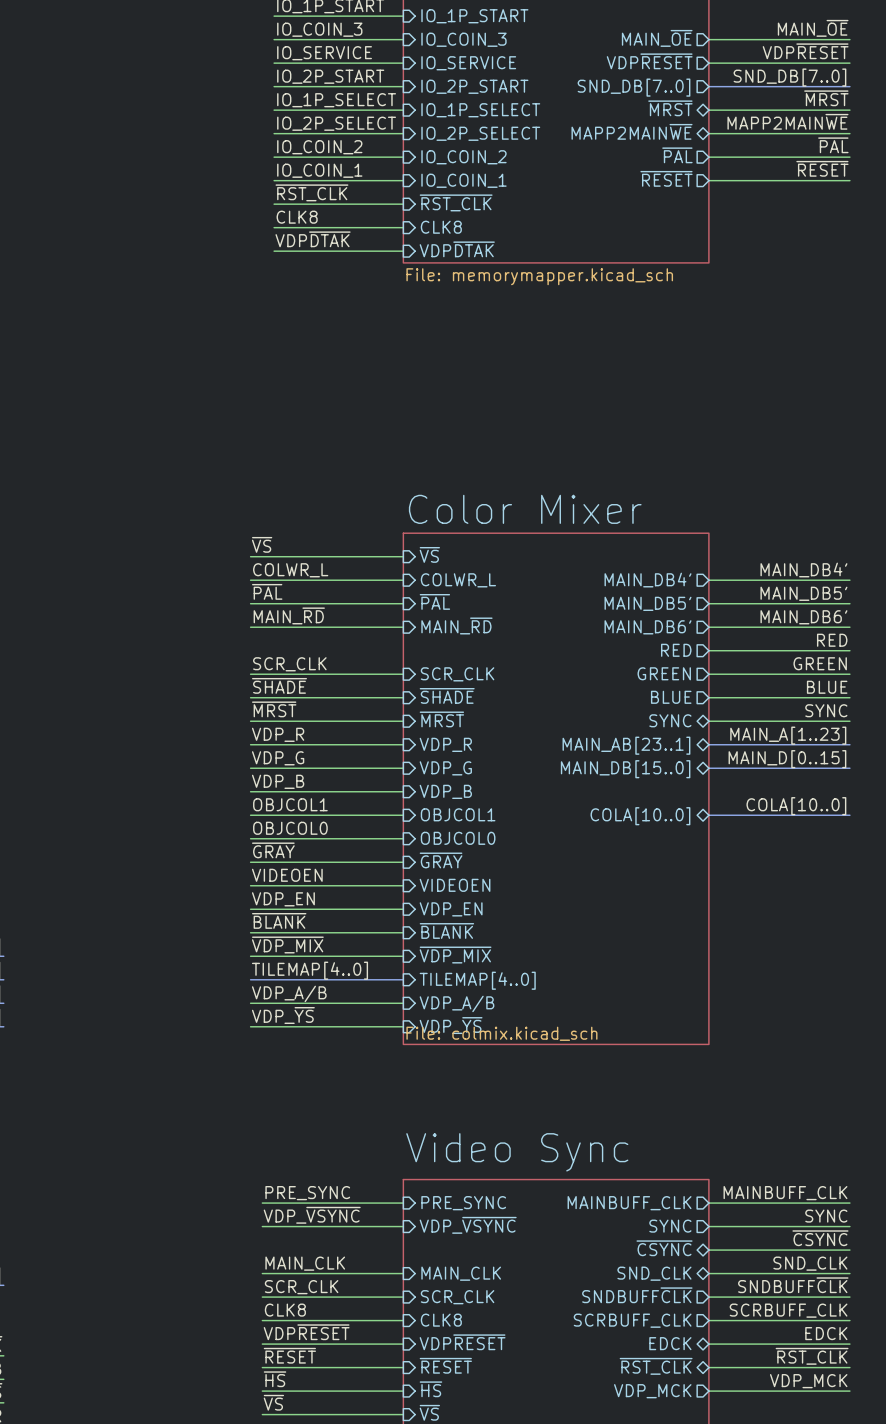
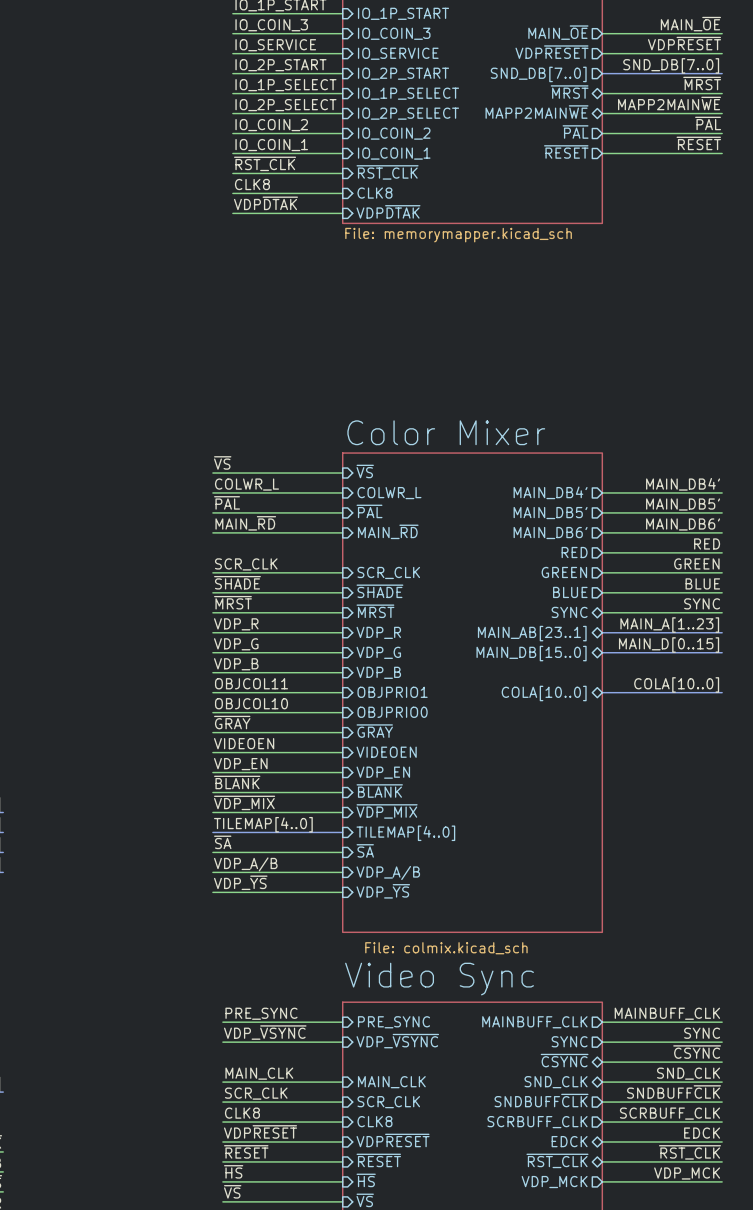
sheet Color Mixer: File: colmix.kicad_sch (556, 788) -> none
label: OBJCOL1 (290, 804) -> OBJCOL11 (251, 683)
sheet pin: OBJCOL1 (458, 814) -> OBJPRIO1 (392, 692)
sheet Color Mixer: none -> File: colmix.kicad_sch (472, 692)
label: OBJCOL0 (290, 828) -> OBJCOL10 (251, 703)
sheet pin: OBJCOL0 (458, 838) -> OBJPRIO0 (392, 712)
label: VDP_A/B (289, 993) -> ~{SA} (222, 842)
sheet pin: VDP_A/B (456, 1003) -> ~{SA} (365, 850)
label: VDP_~{YS} (283, 1015) -> VDP_A/B (245, 864)
sheet pin: VDP_~{YS} (451, 1025) -> VDP_A/B (388, 872)
label: none -> VDP_~{YS} (240, 882)
sheet pin: none -> VDP_~{YS} (383, 891)
wire: none -> (212, 892) (342, 892)

